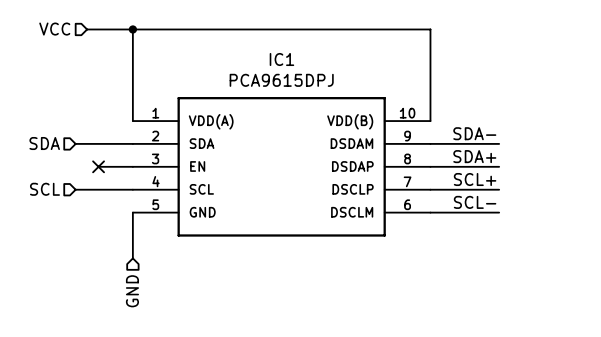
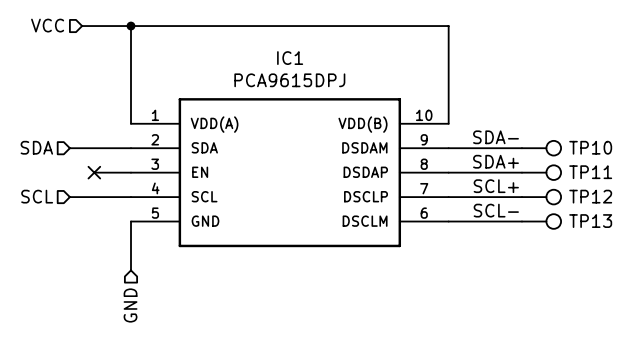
TP10: none -> (541, 148)
TP11: none -> (541, 172)
TP12: none -> (541, 197)
TP13: none -> (541, 221)

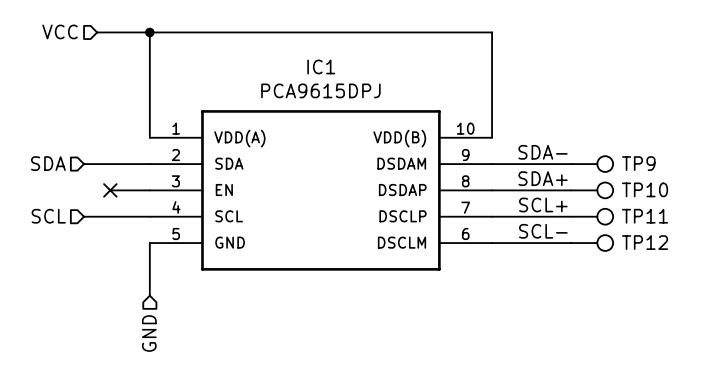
TP10 name: TP10 (590, 147) -> TP9 (638, 163)
TP11 name: TP11 (590, 172) -> TP10 (645, 189)
TP12 name: TP12 (590, 196) -> TP11 (645, 216)
TP13 name: TP13 (590, 221) -> TP12 (645, 242)

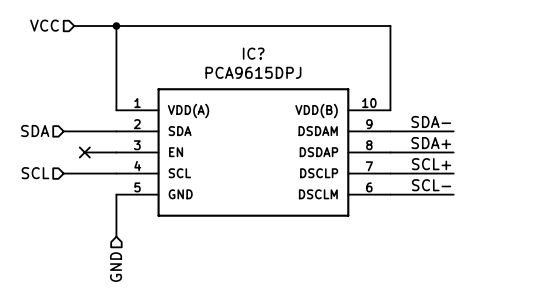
IC1 name: IC1 (321, 66) -> IC? (253, 53)
TP9: (592, 164) -> none
TP10: (592, 190) -> none
TP11: (592, 216) -> none
TP12: (592, 243) -> none

